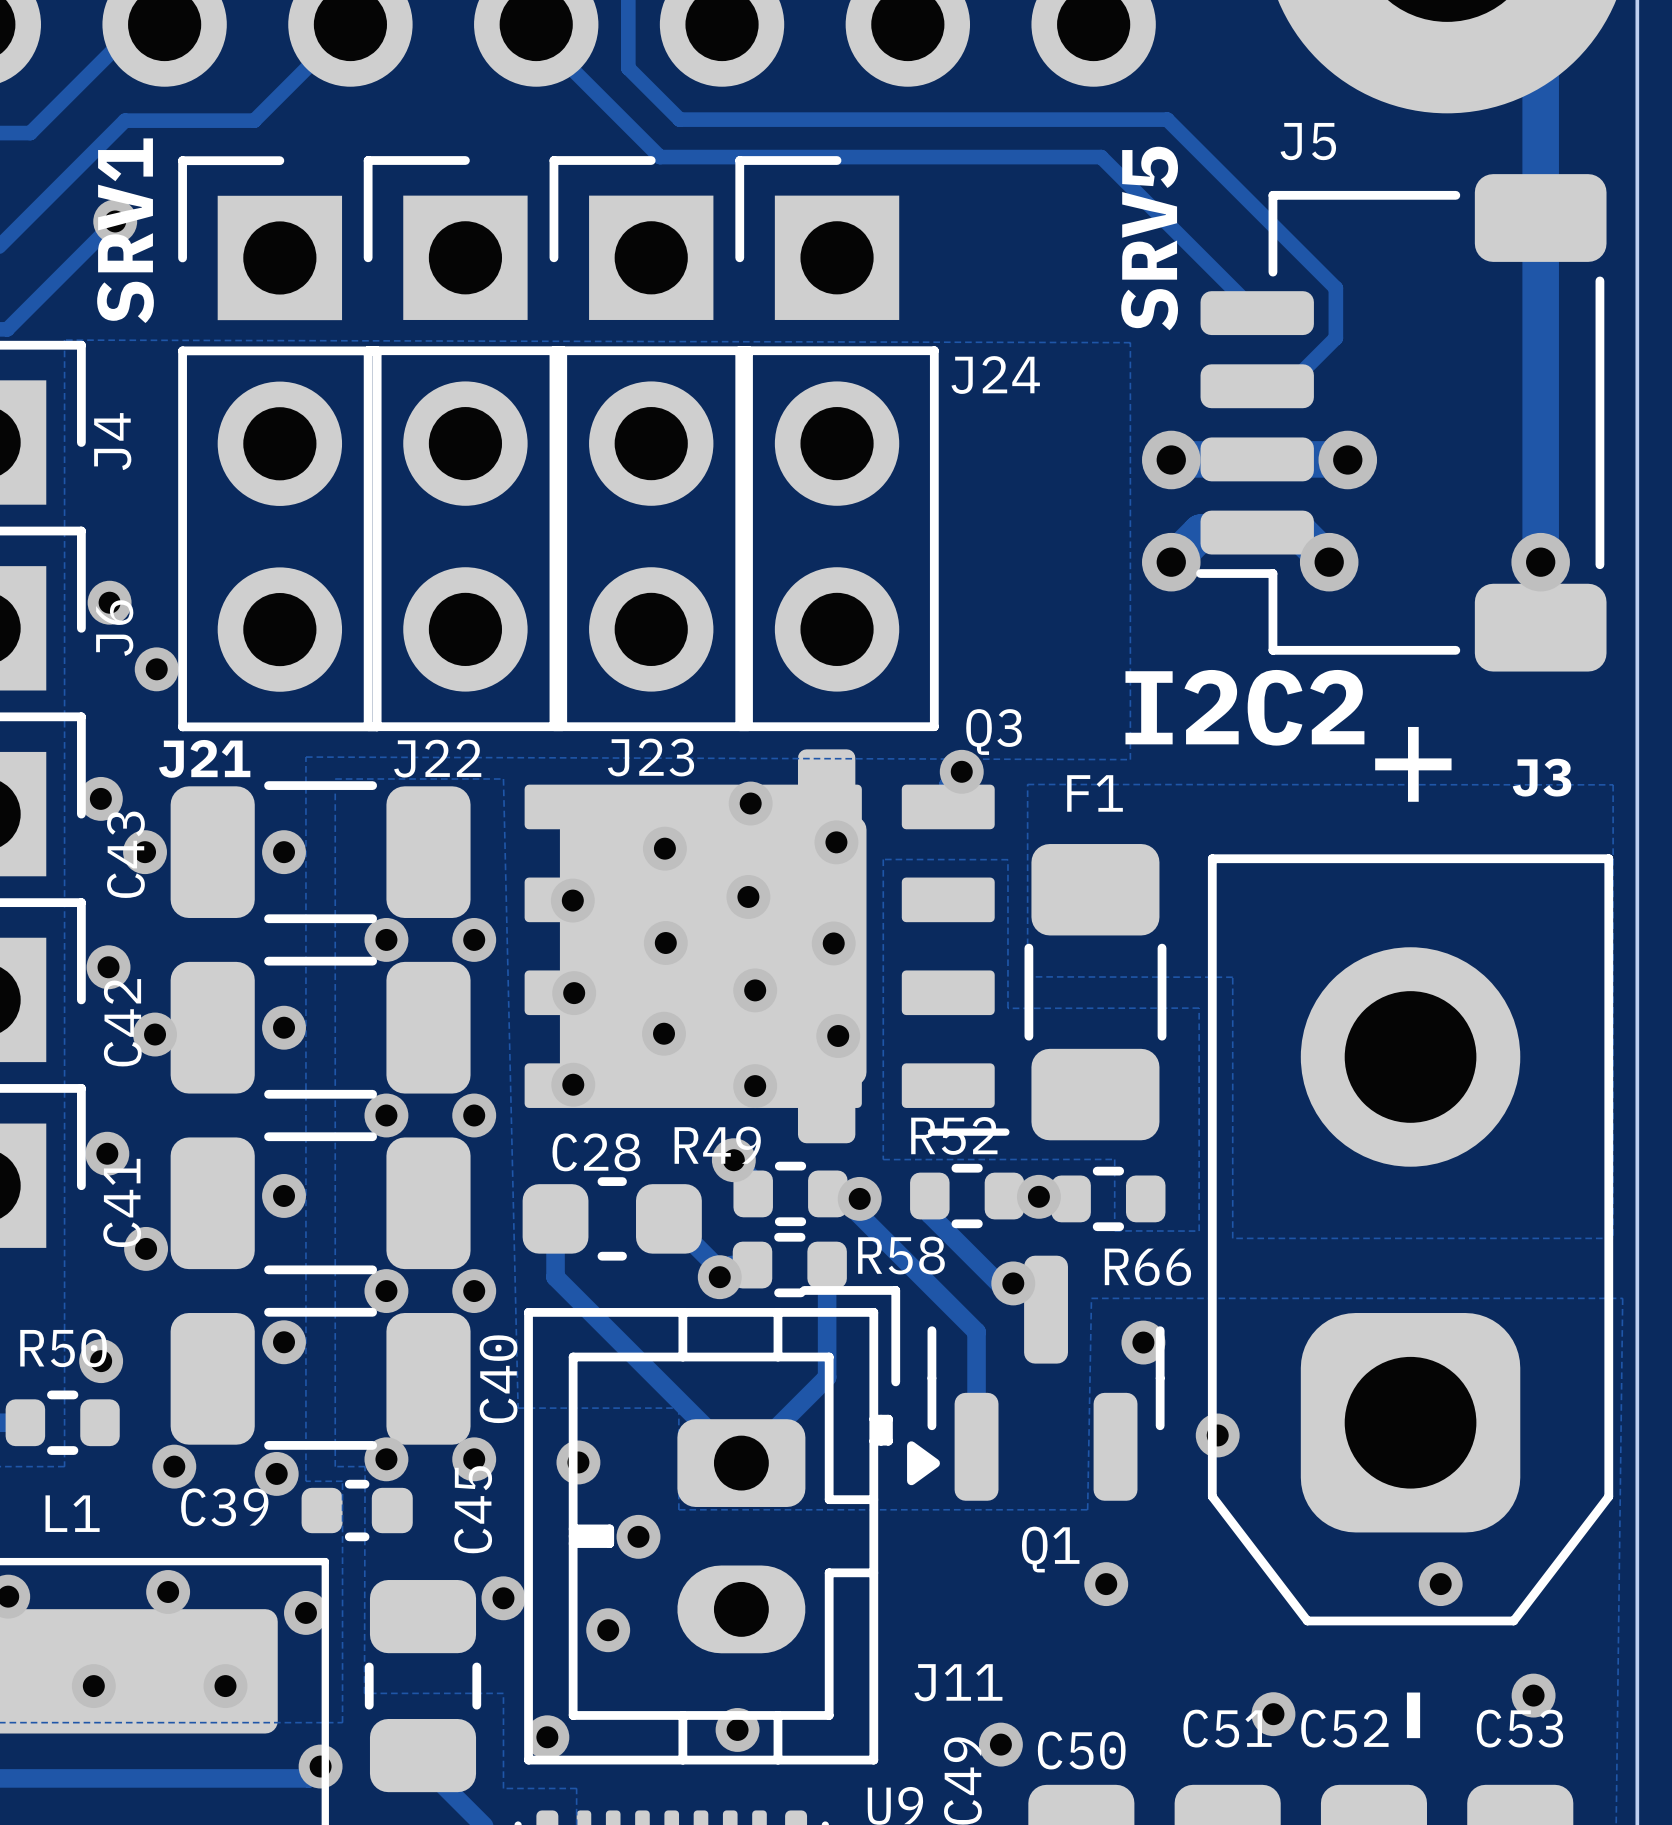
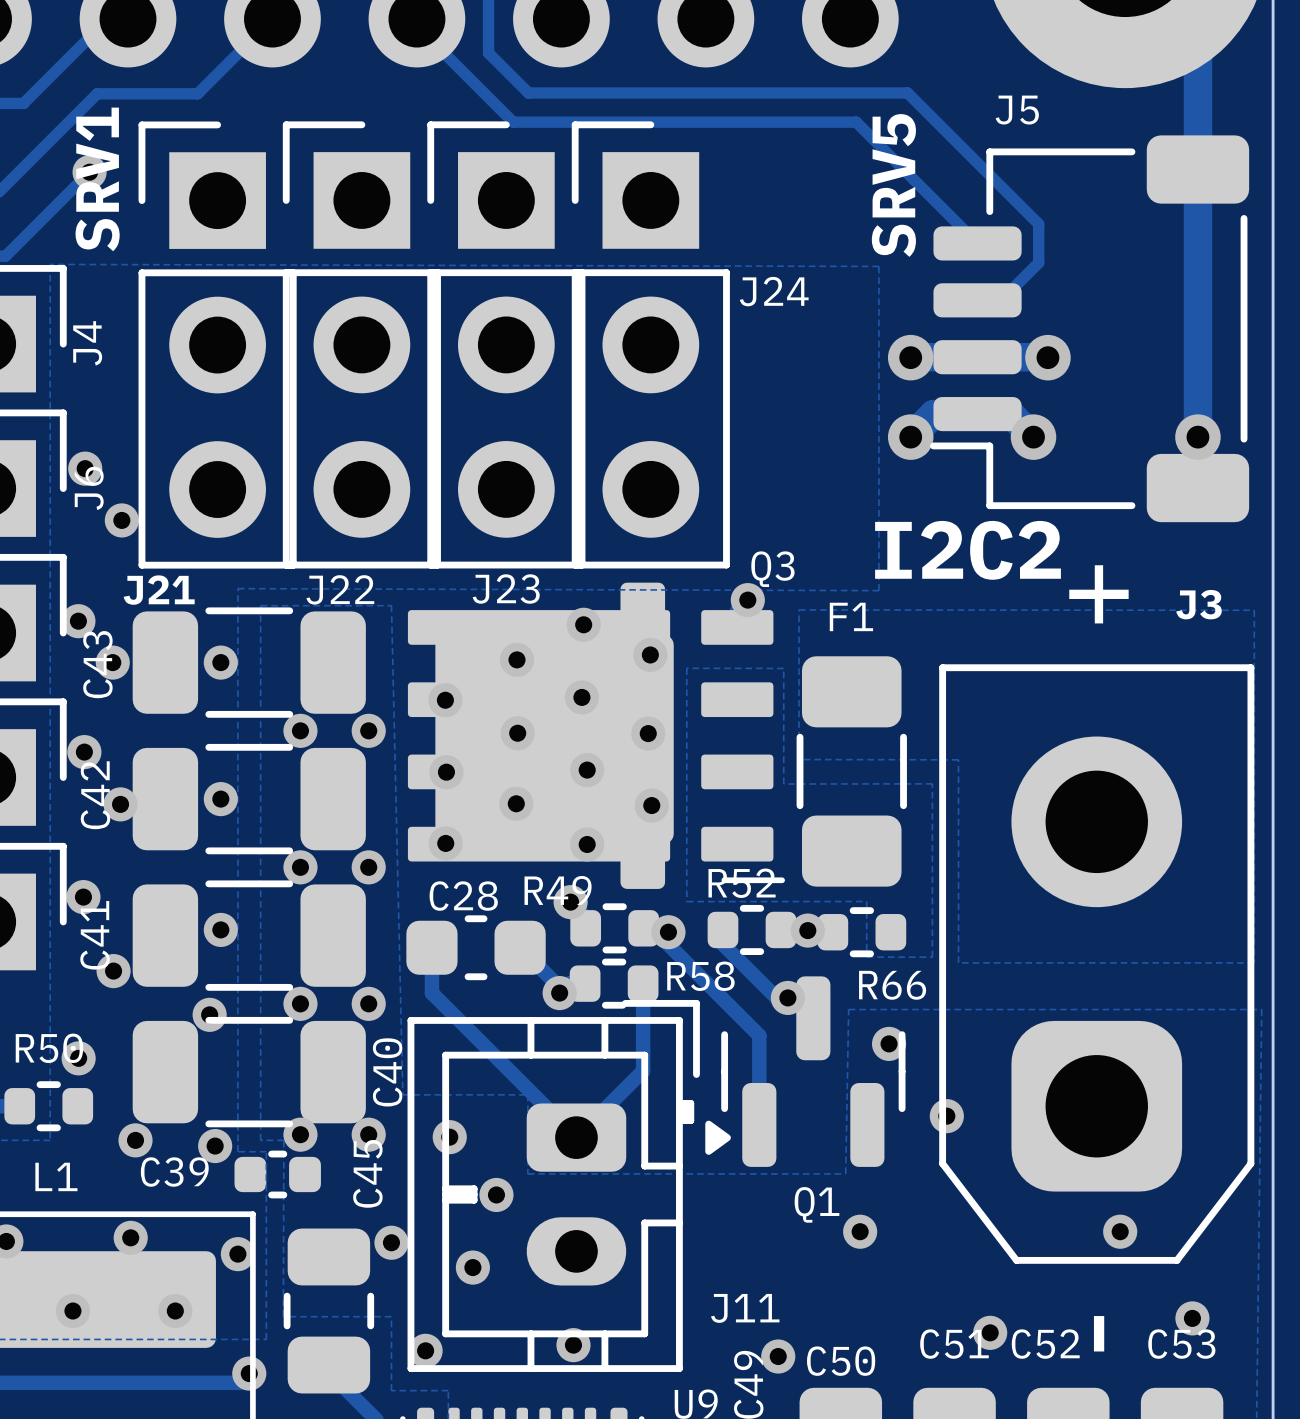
via position: (284, 1342) -> (209, 1014)

